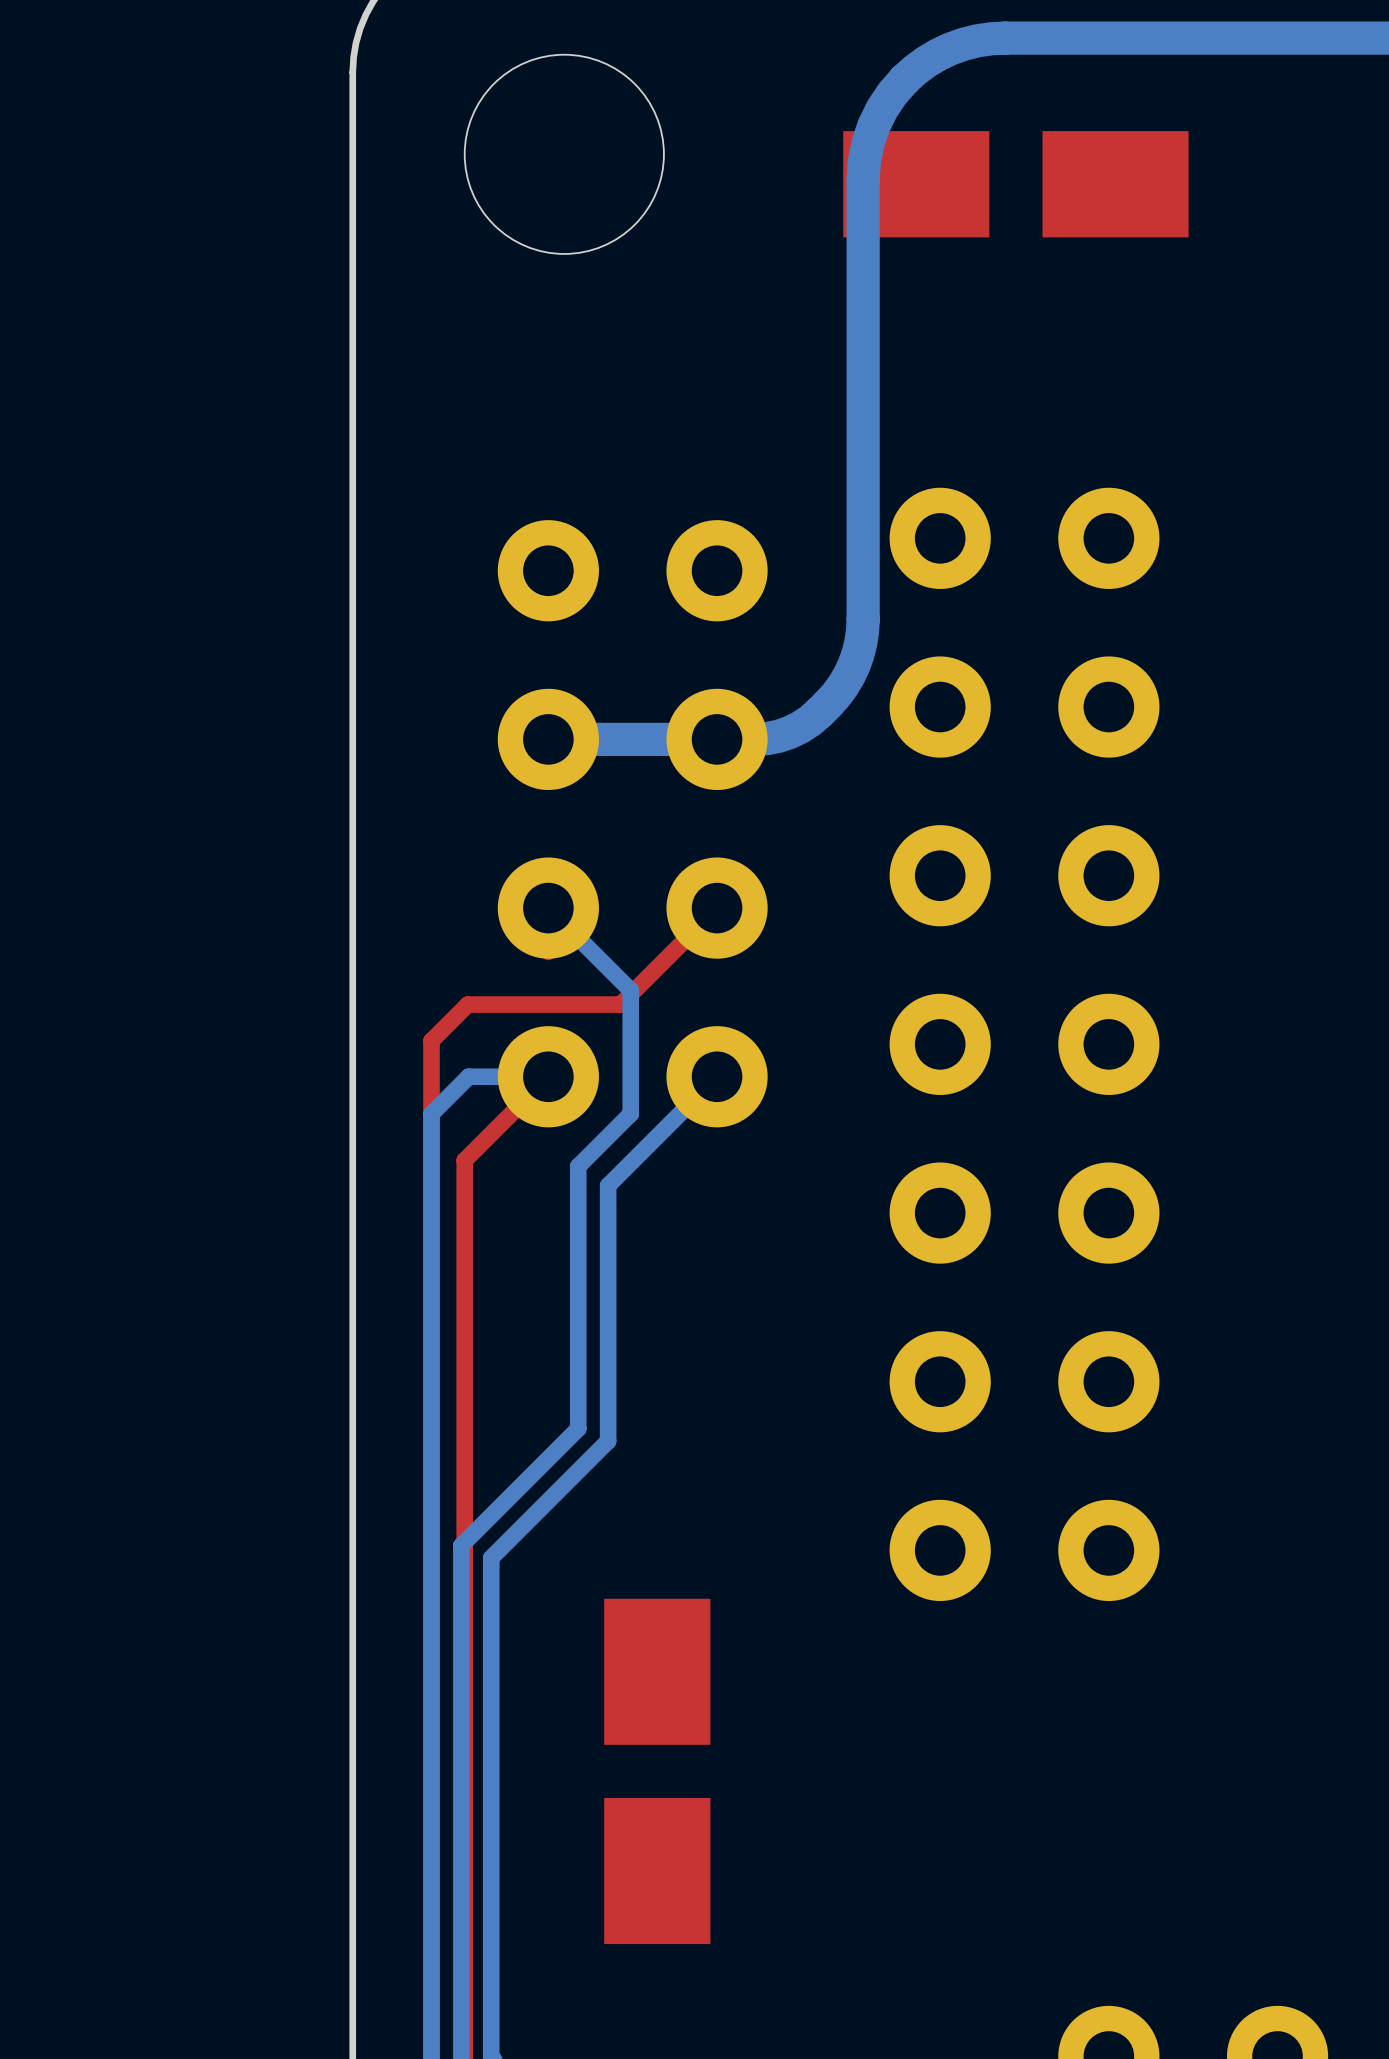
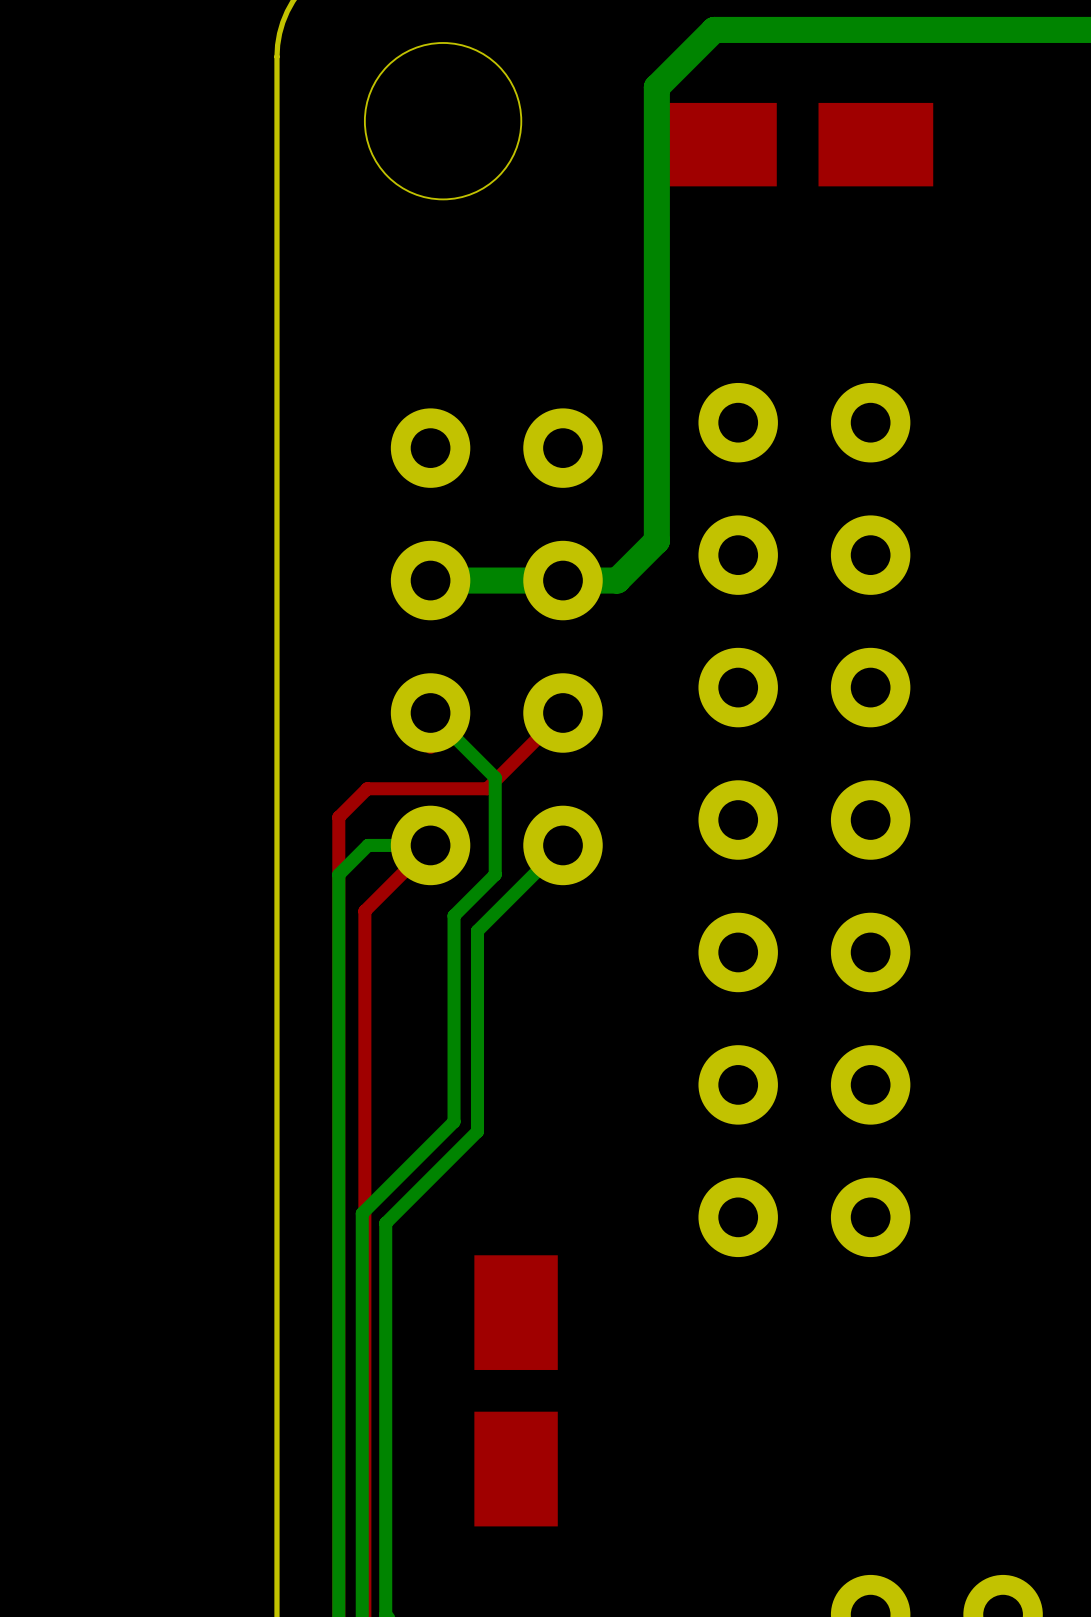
bottom track: (1004, 38) (963, 44) (926, 62) (904, 79) (892, 93) (873, 125) (867, 143) (863, 179) (863, 619) (860, 642) (848, 675) (835, 695) (819, 712) (810, 720) (789, 732) (766, 738) (754, 739) -> (788, 29) (714, 29) (656, 87) (656, 540) (617, 580) (592, 580)

